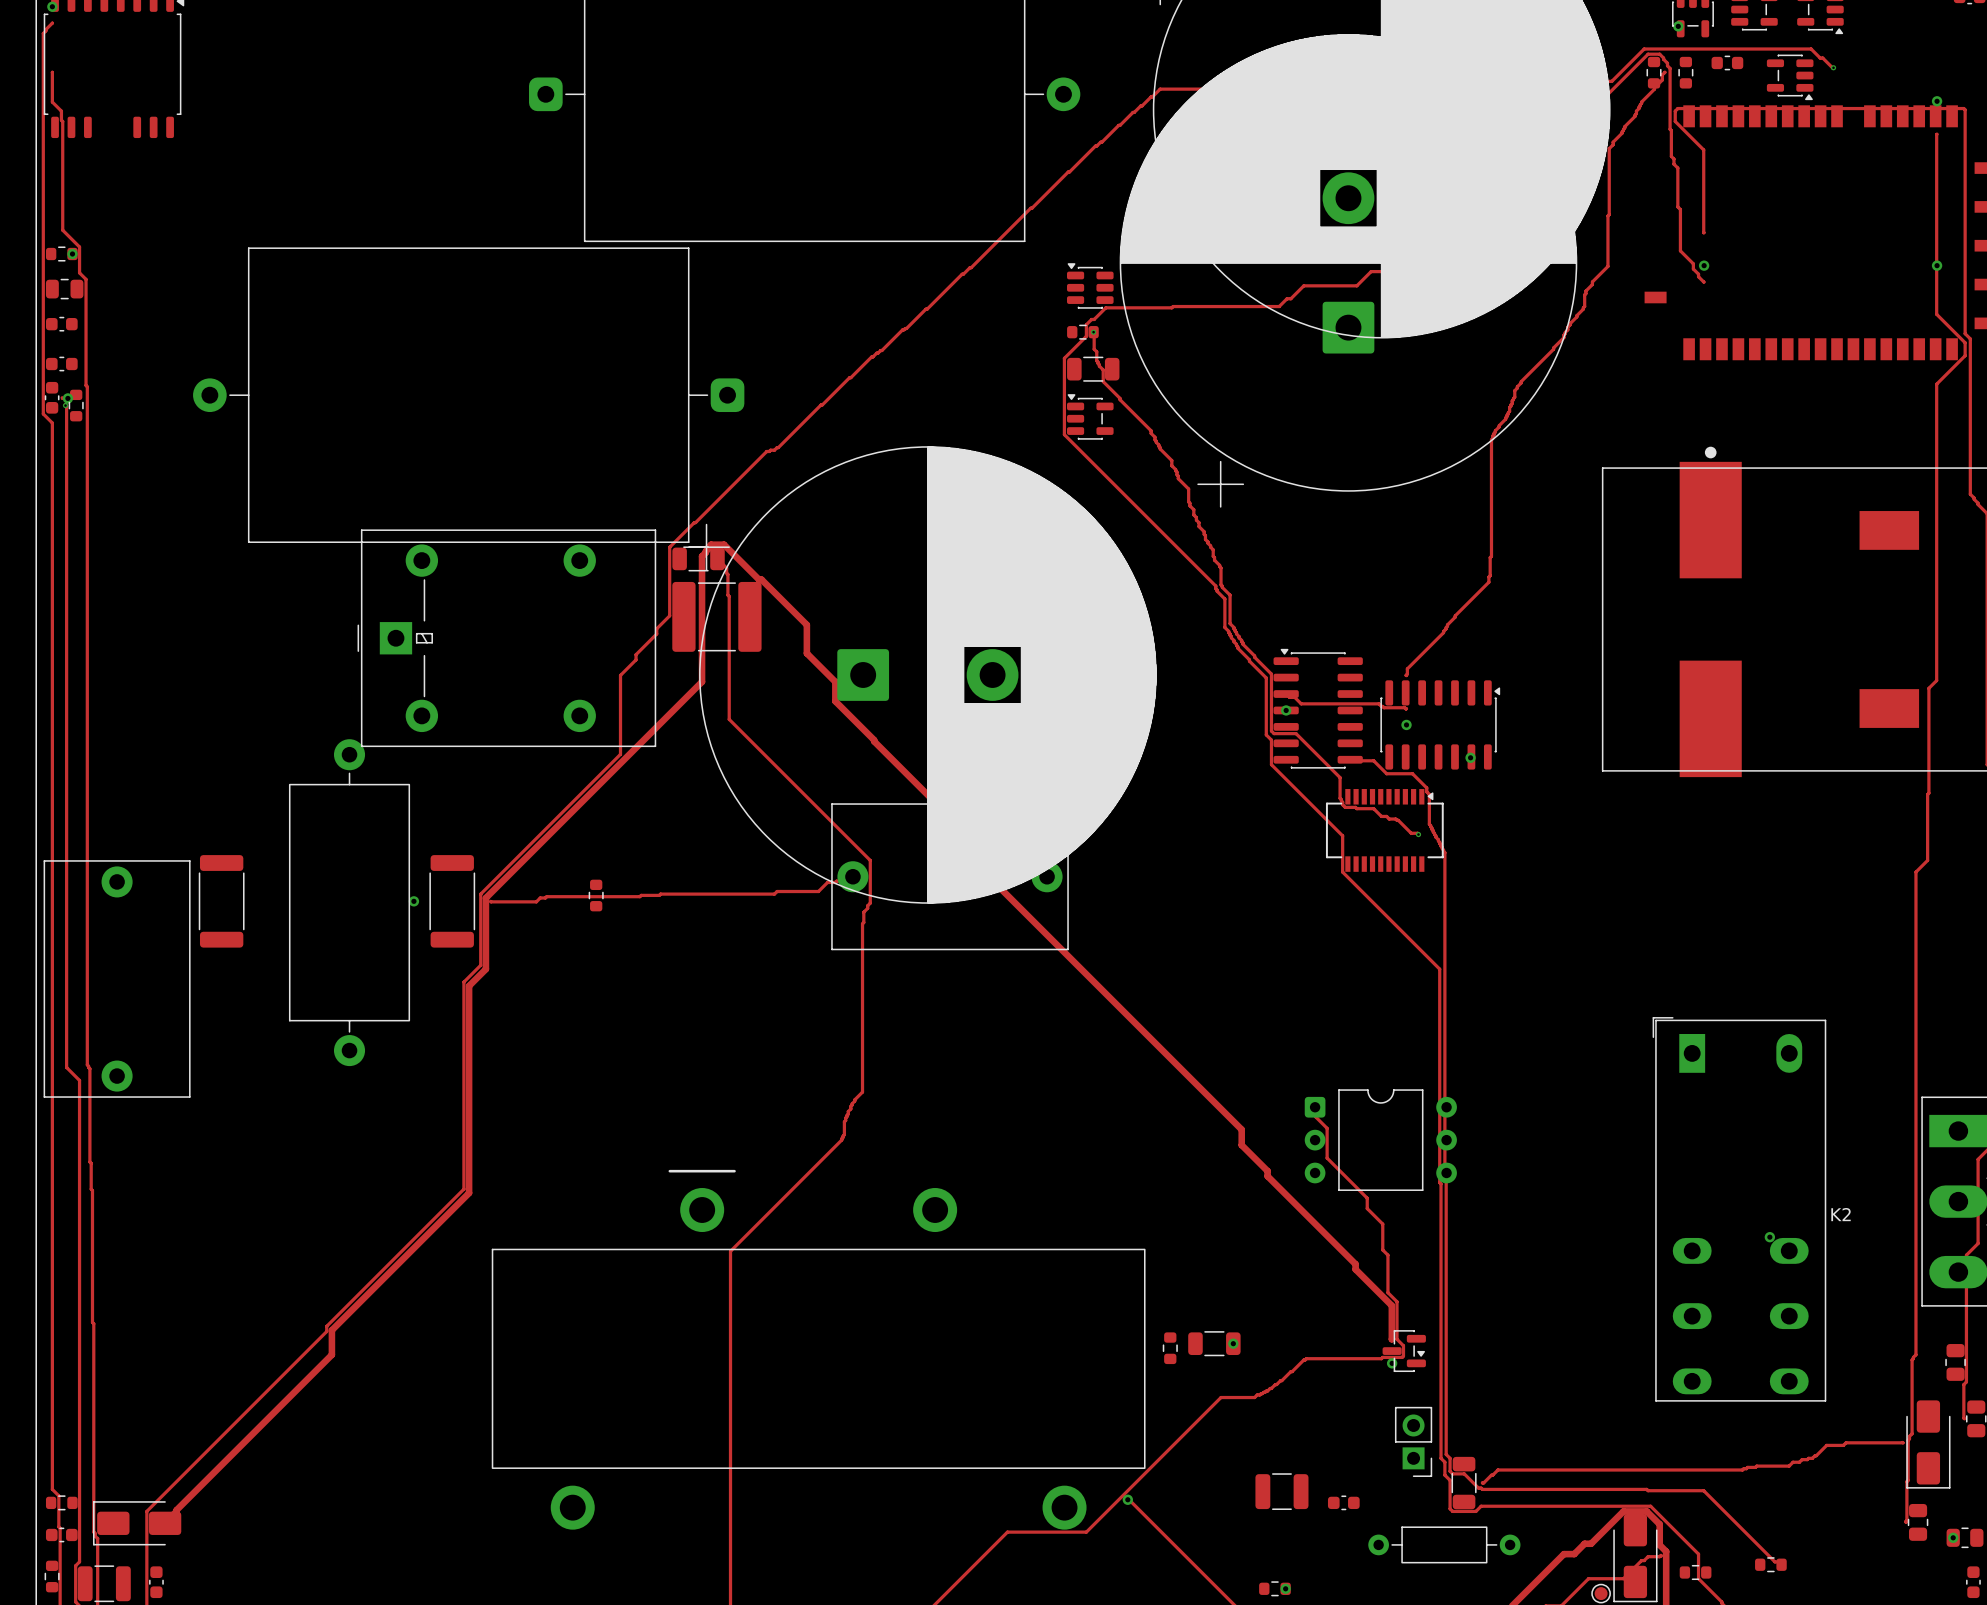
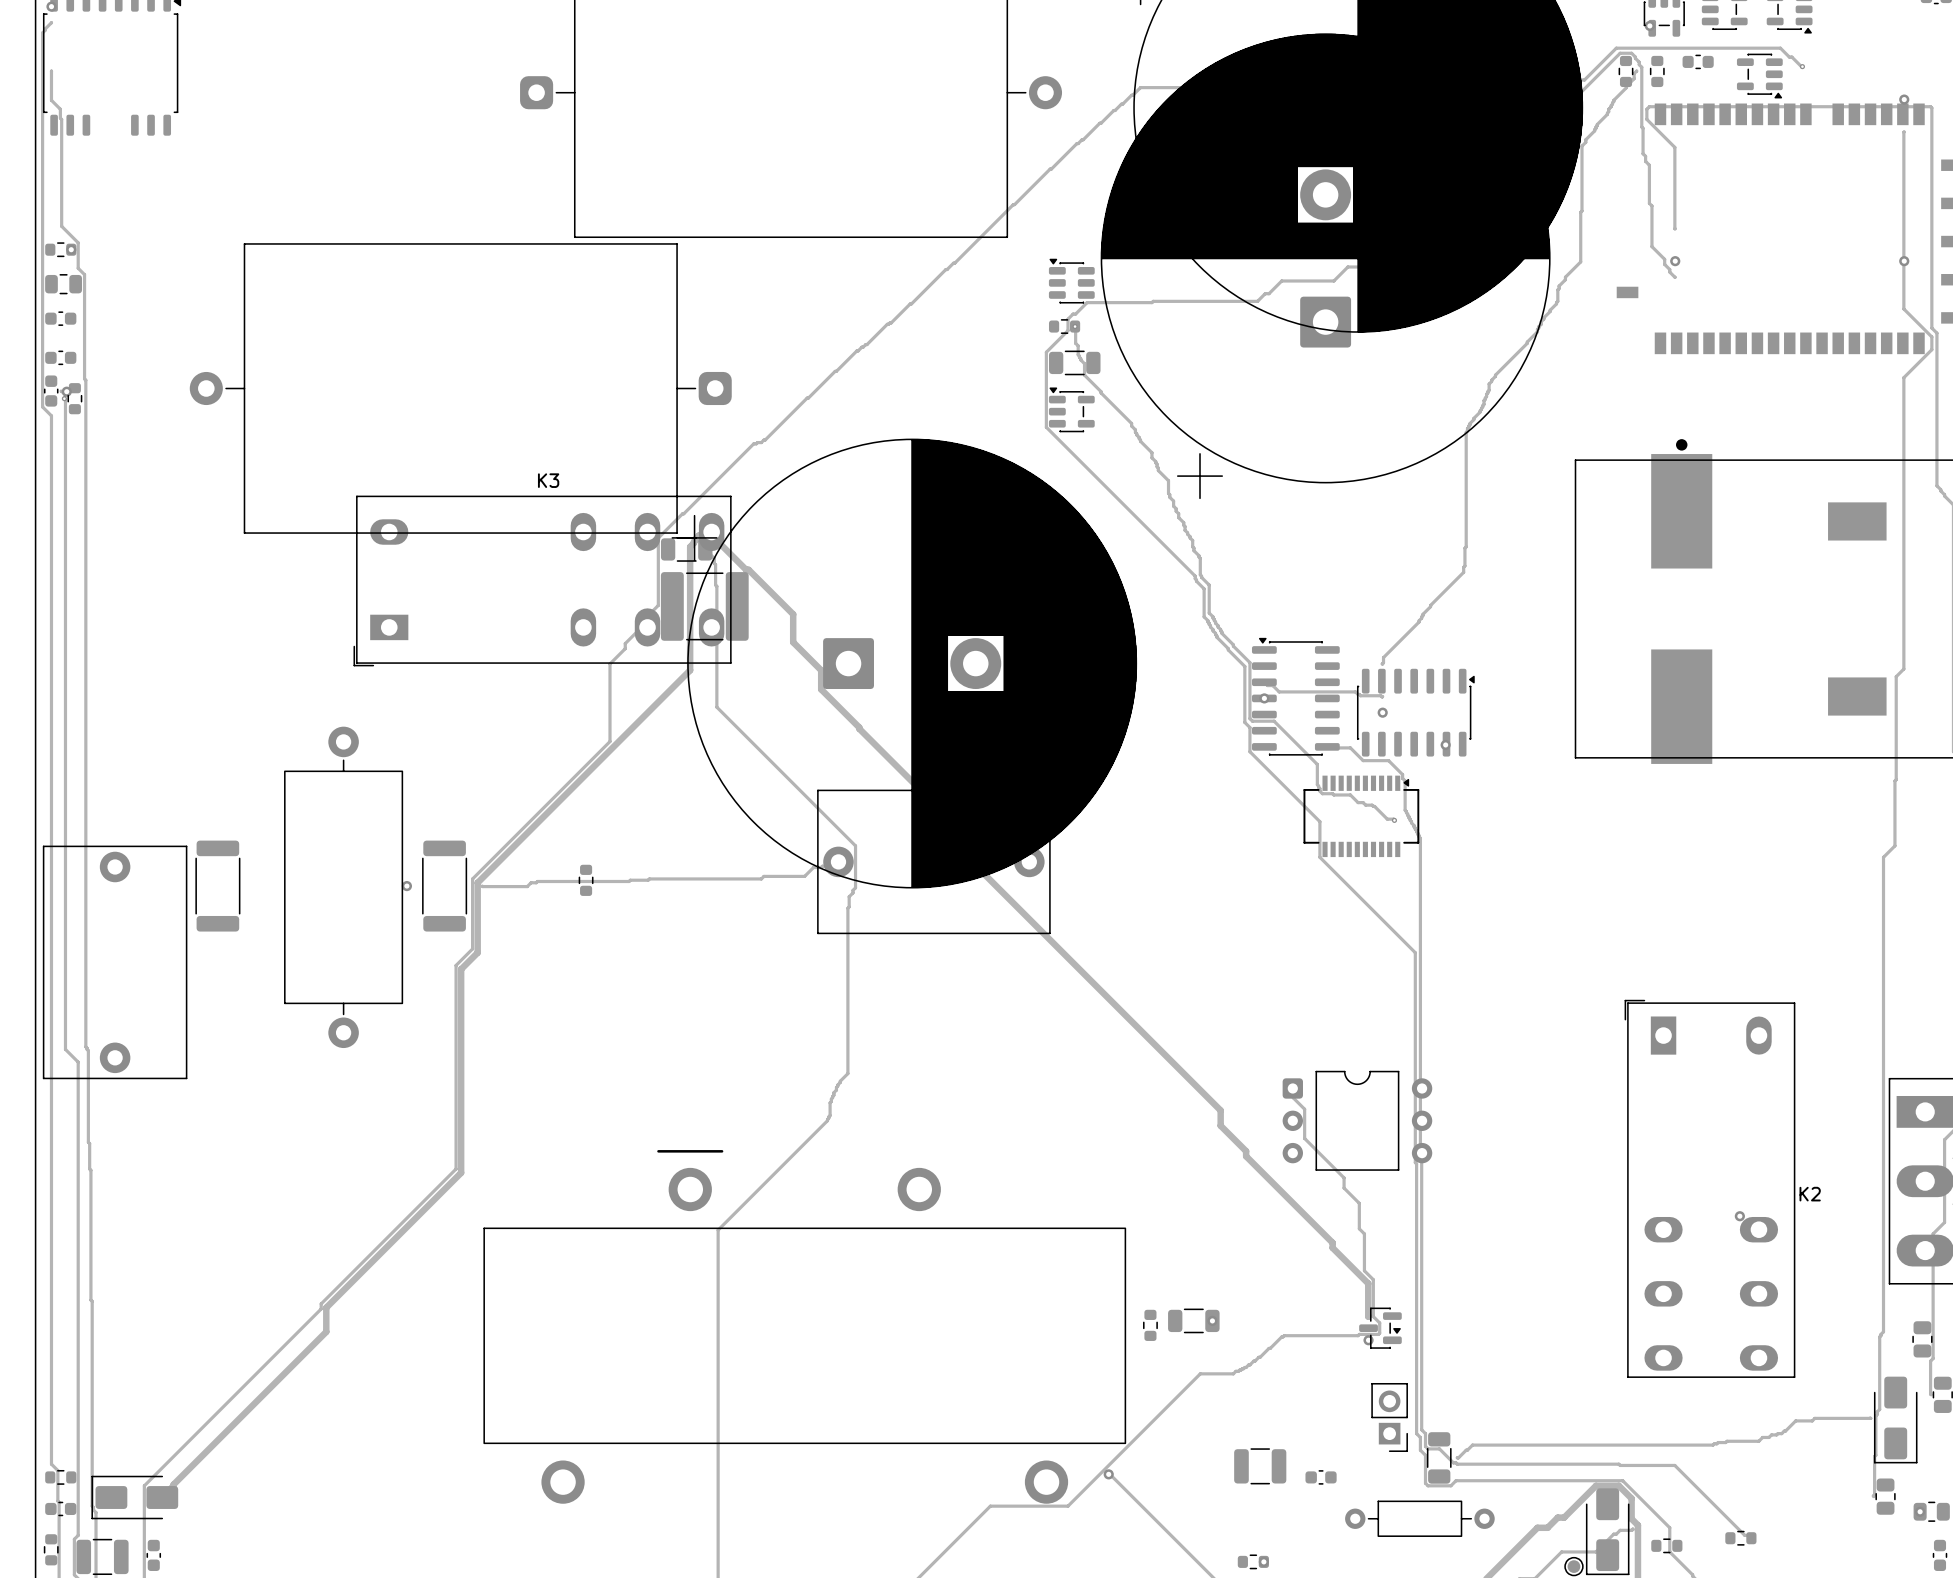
K3: none -> (542, 580)
part: (506, 638) -> none

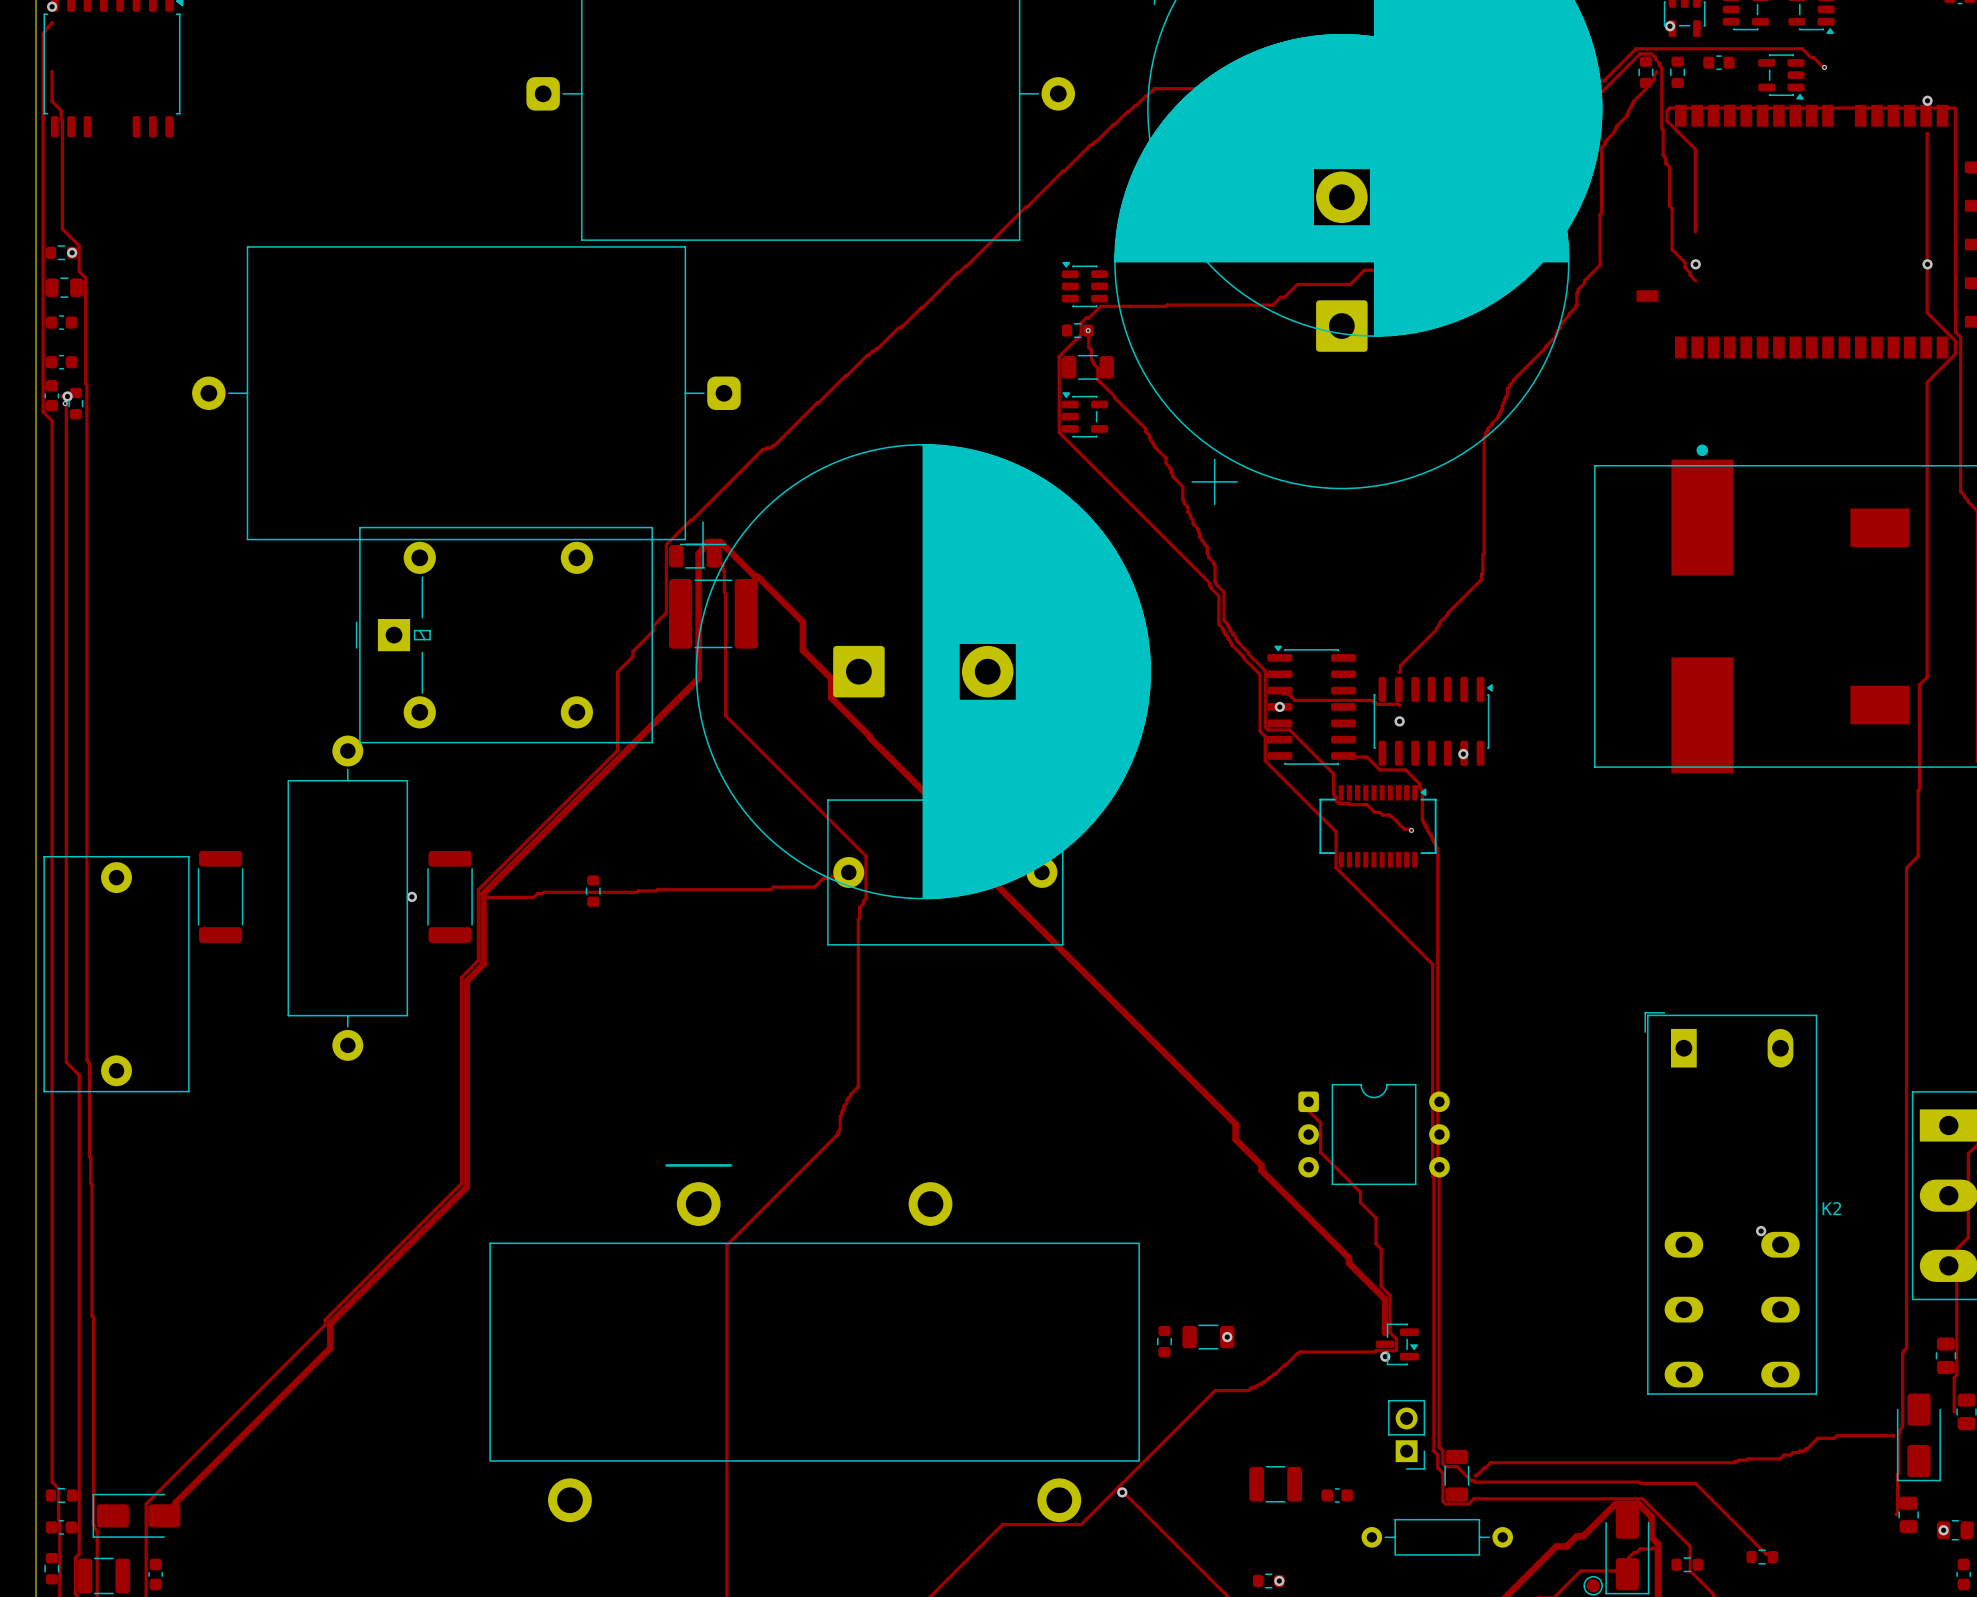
K3: (542, 580) -> none
part: none -> (504, 635)

